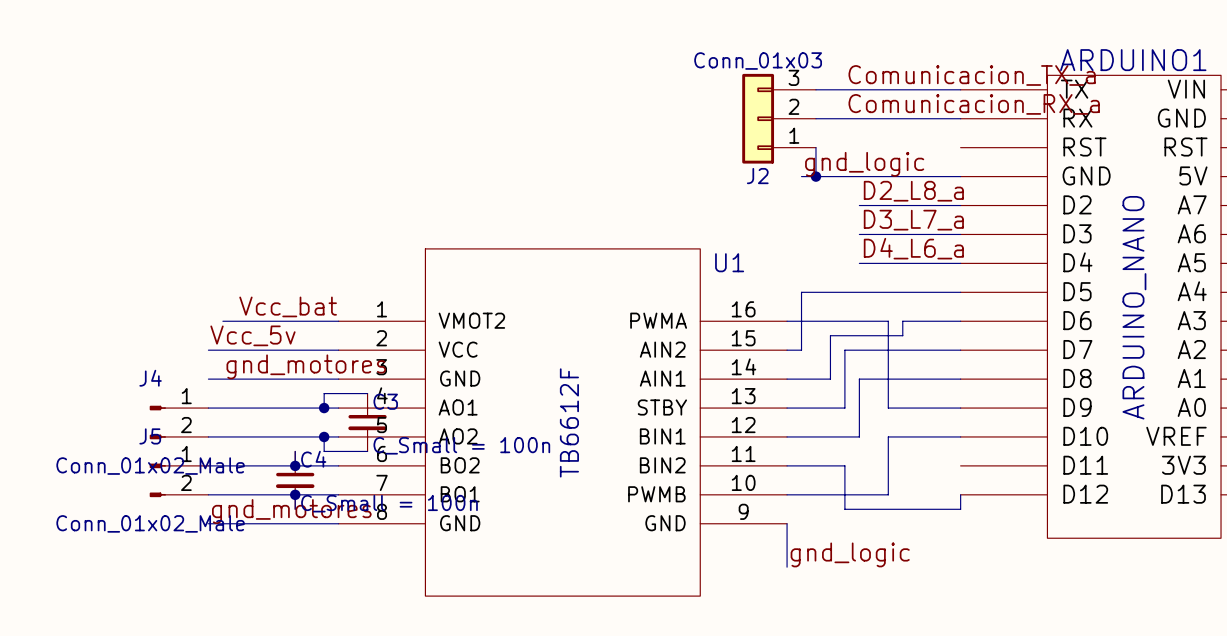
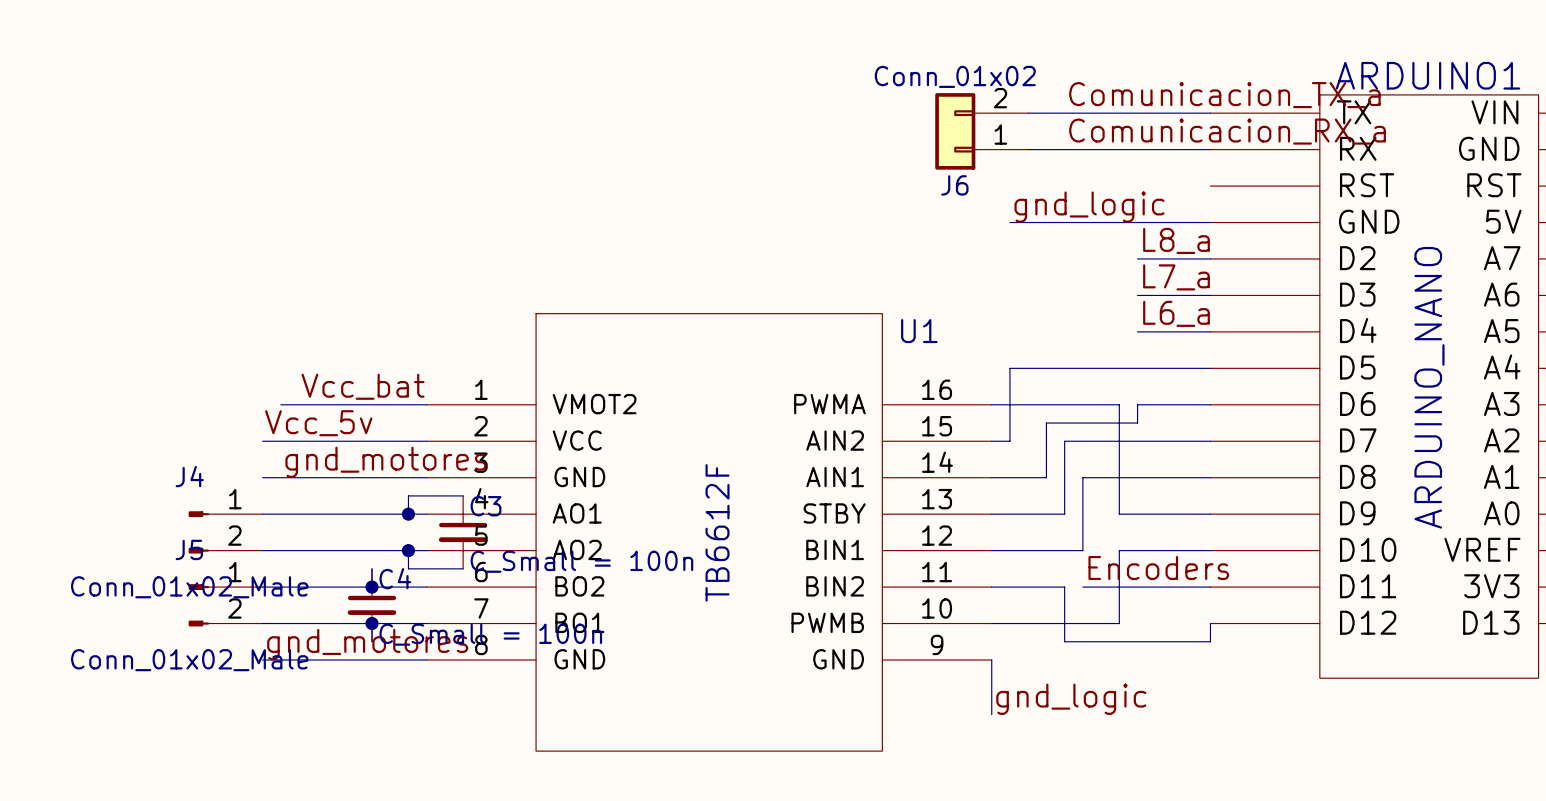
J6: none -> Conn_01x02 (981, 131)
J2: Conn_01x03 (779, 118) -> none
wire: (815, 147) (815, 176) -> none
junction: (815, 176) -> none
label: D2_L8_a (913, 191) -> L8_a (1176, 240)
wire: (859, 205) (902, 205) -> none
label: D3_L7_a (913, 220) -> L7_a (1176, 277)
wire: (859, 234) (902, 234) -> none
label: D4_L6_a (913, 248) -> L6_a (1176, 313)
wire: (859, 263) (902, 263) -> none
label: none -> Encoders (1158, 567)
wire: none -> (1082, 587) (1210, 587)

